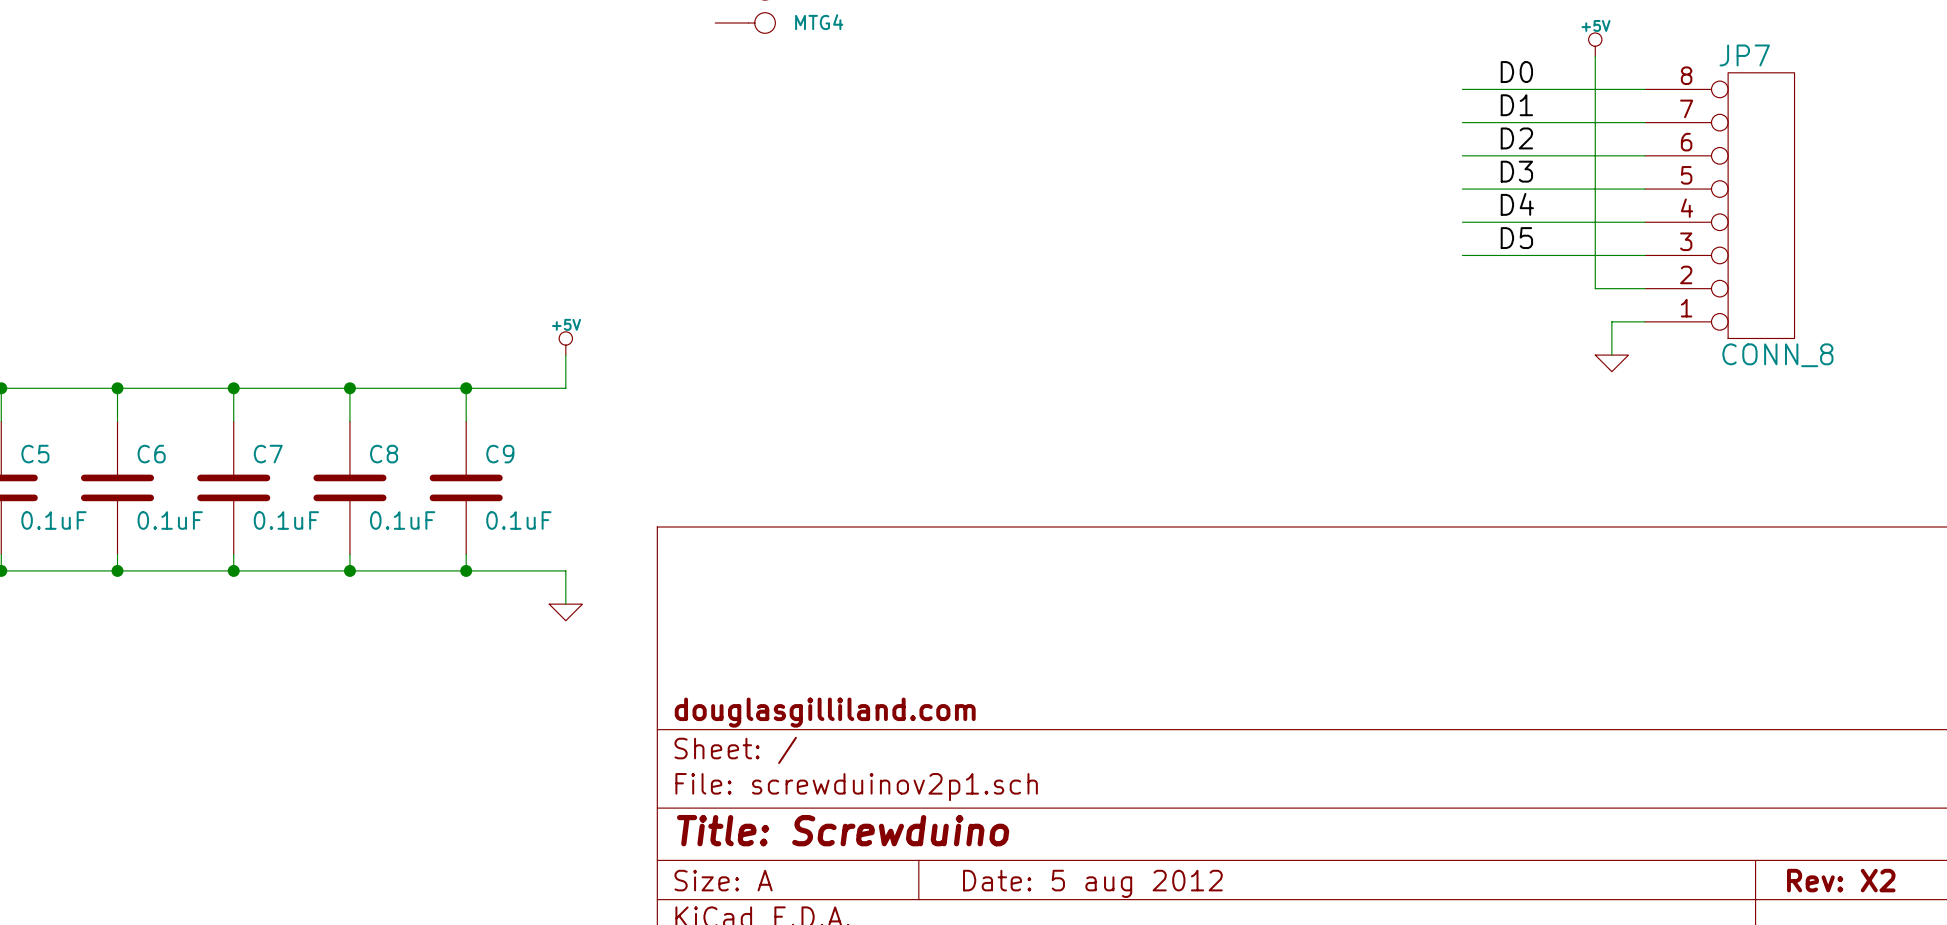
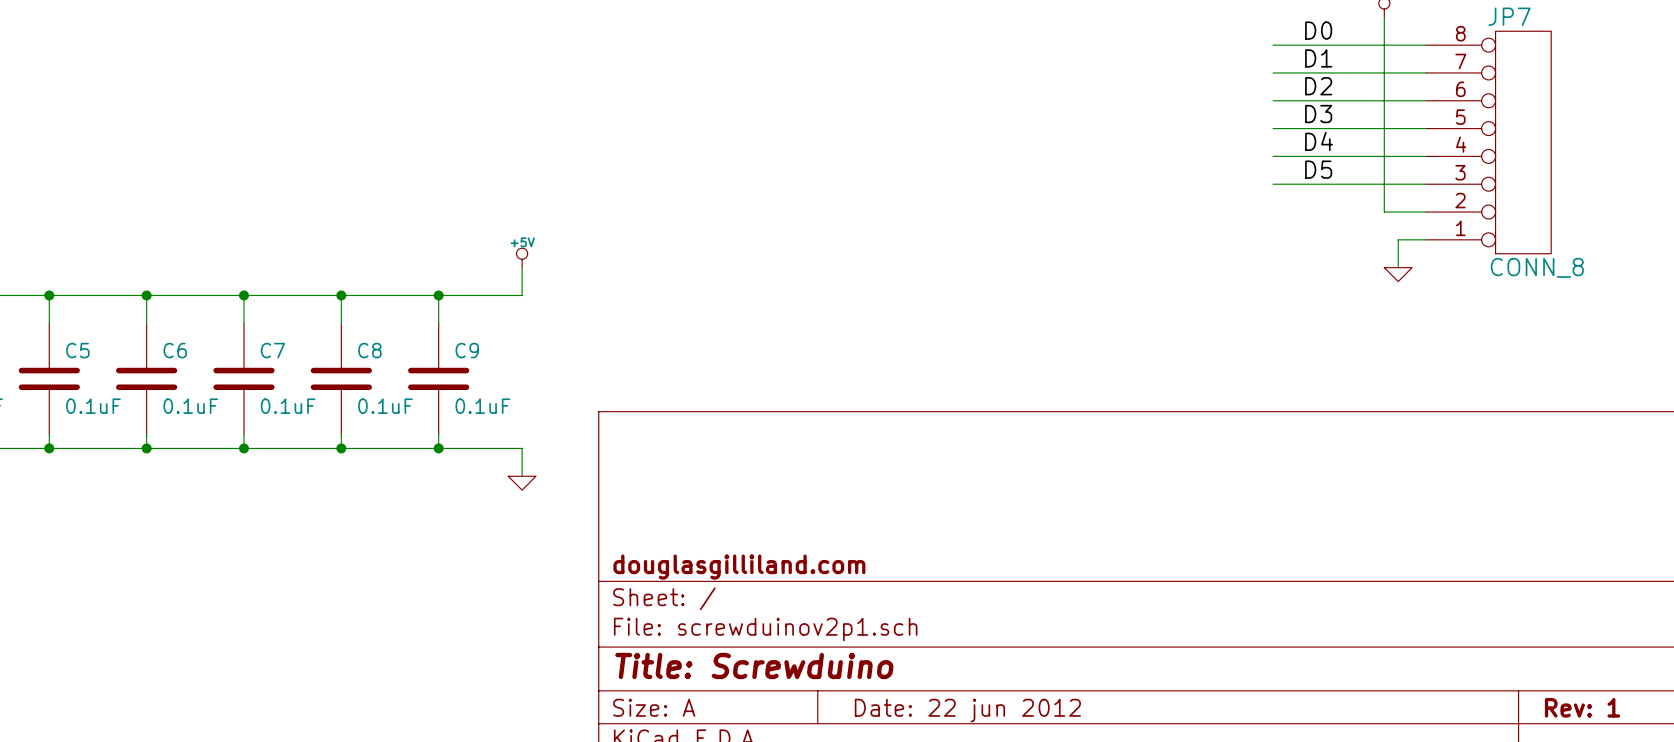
title block: Rev: X2 (1841, 880) -> Rev: 1 (1582, 707)
title block: Date: 5 aug 2012 (1092, 883) -> Date: 22 jun 2012 (967, 710)

